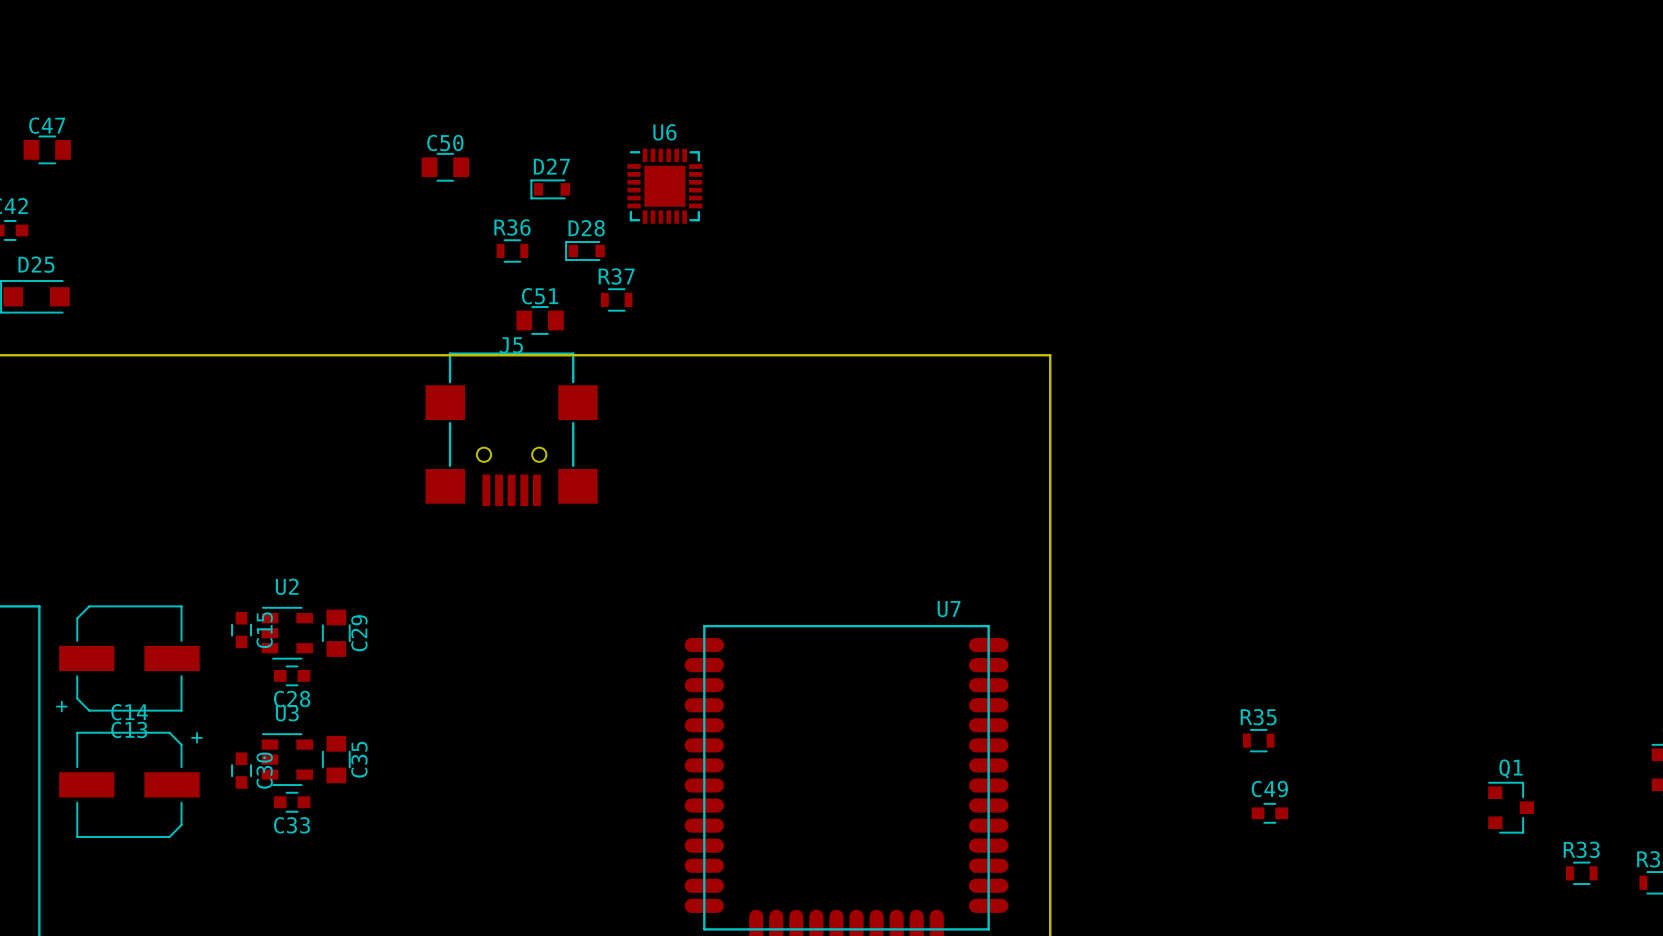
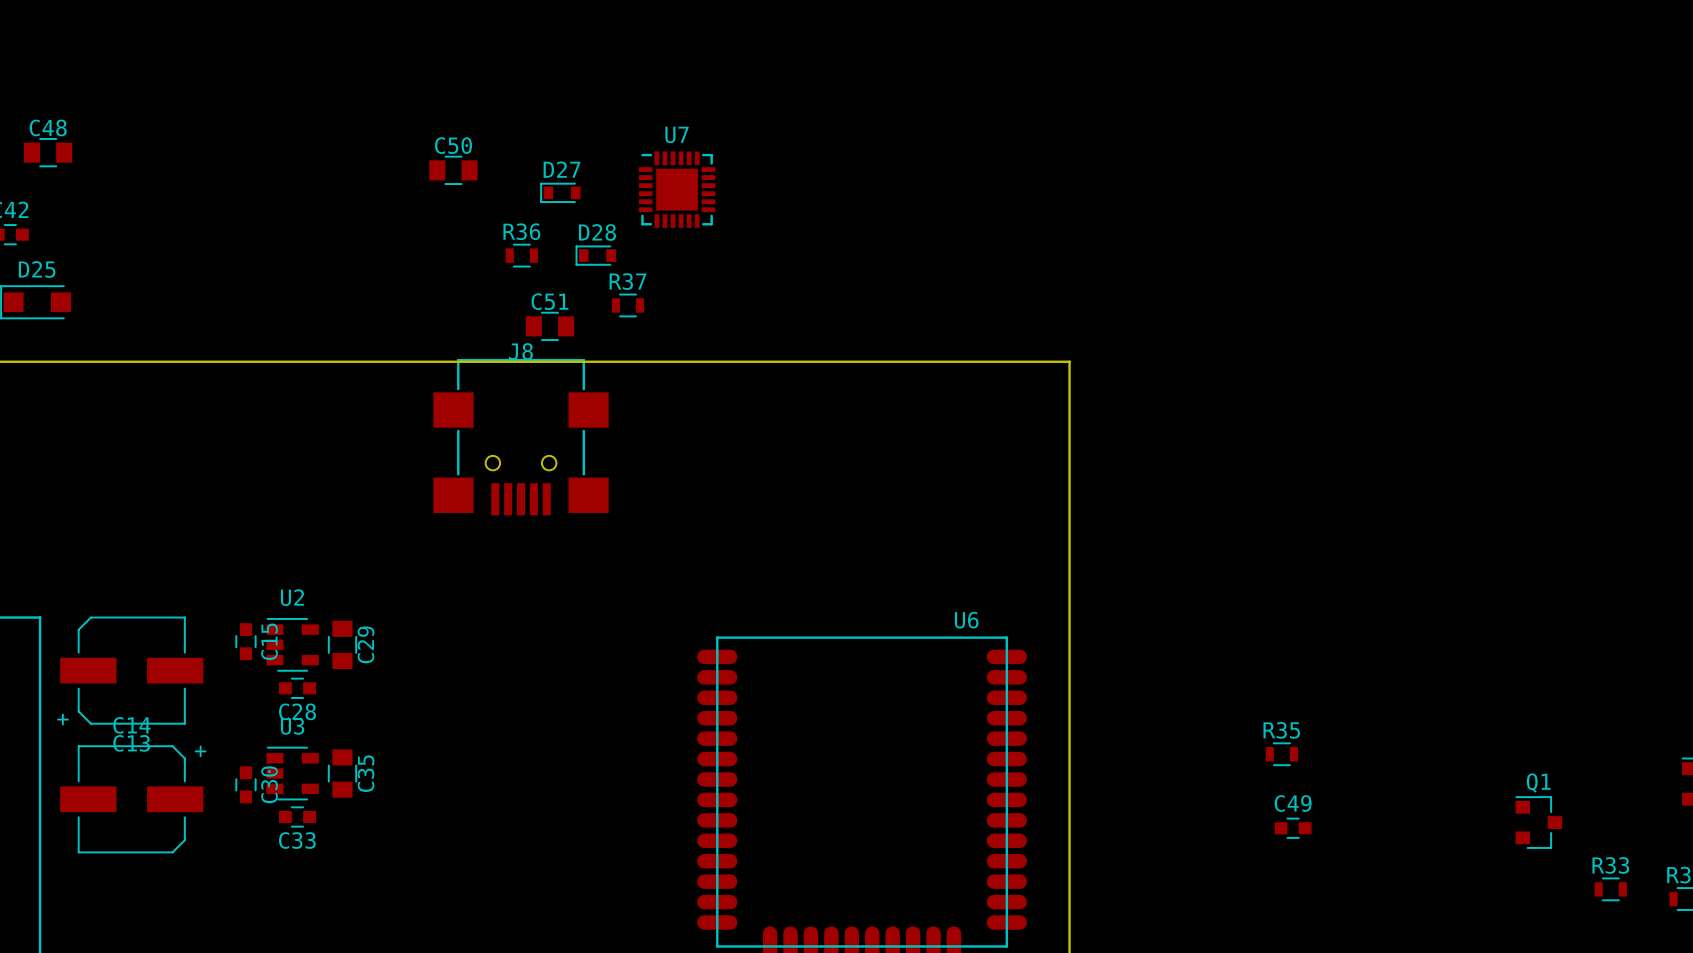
C47 name: C47 (47, 125) -> C48 (48, 127)
U6 name: U6 (664, 132) -> U7 (677, 134)
J5 name: J5 (511, 345) -> J8 (520, 351)
U7 name: U7 (949, 609) -> U6 (966, 620)

